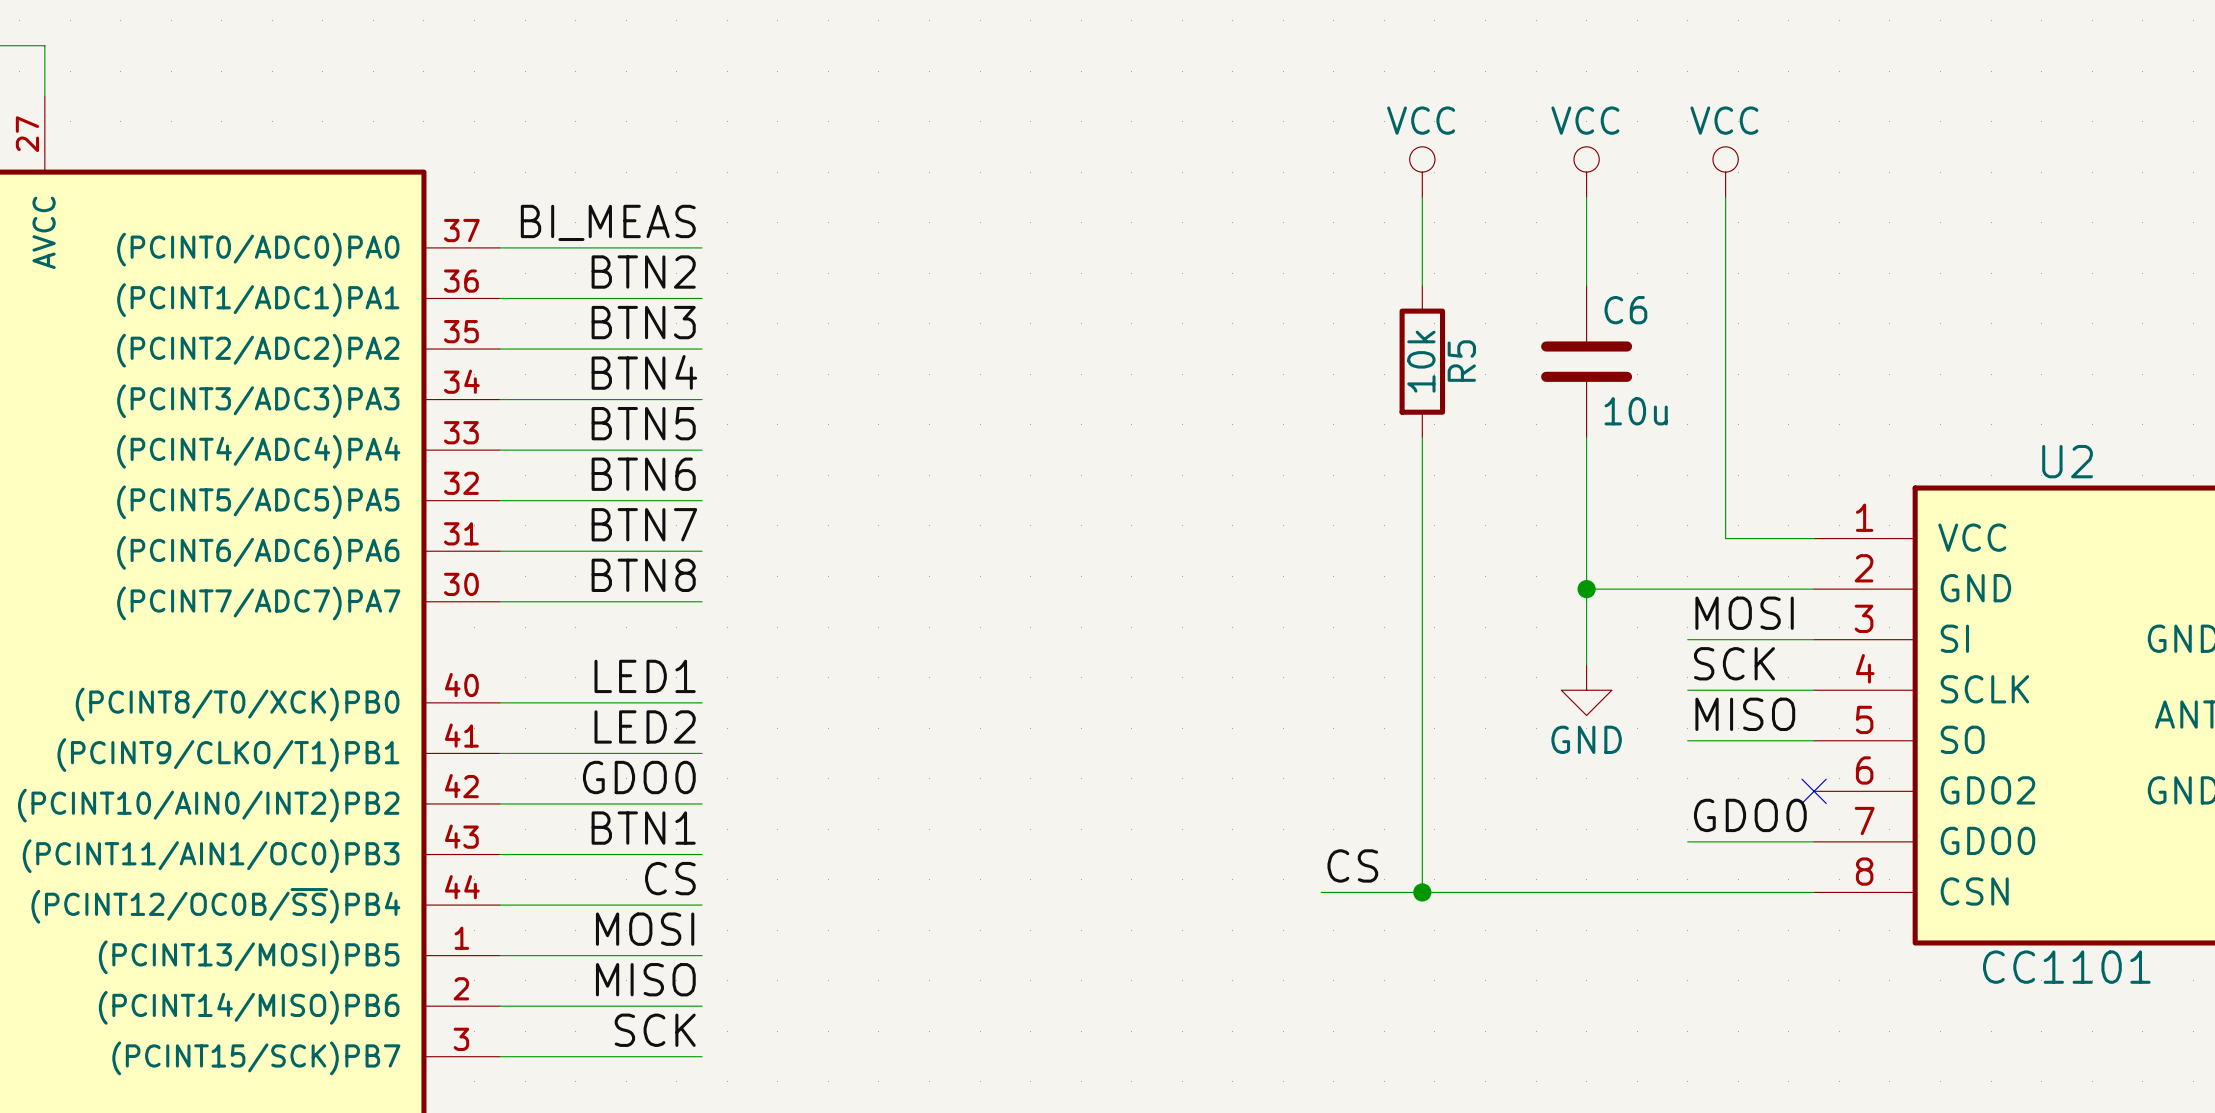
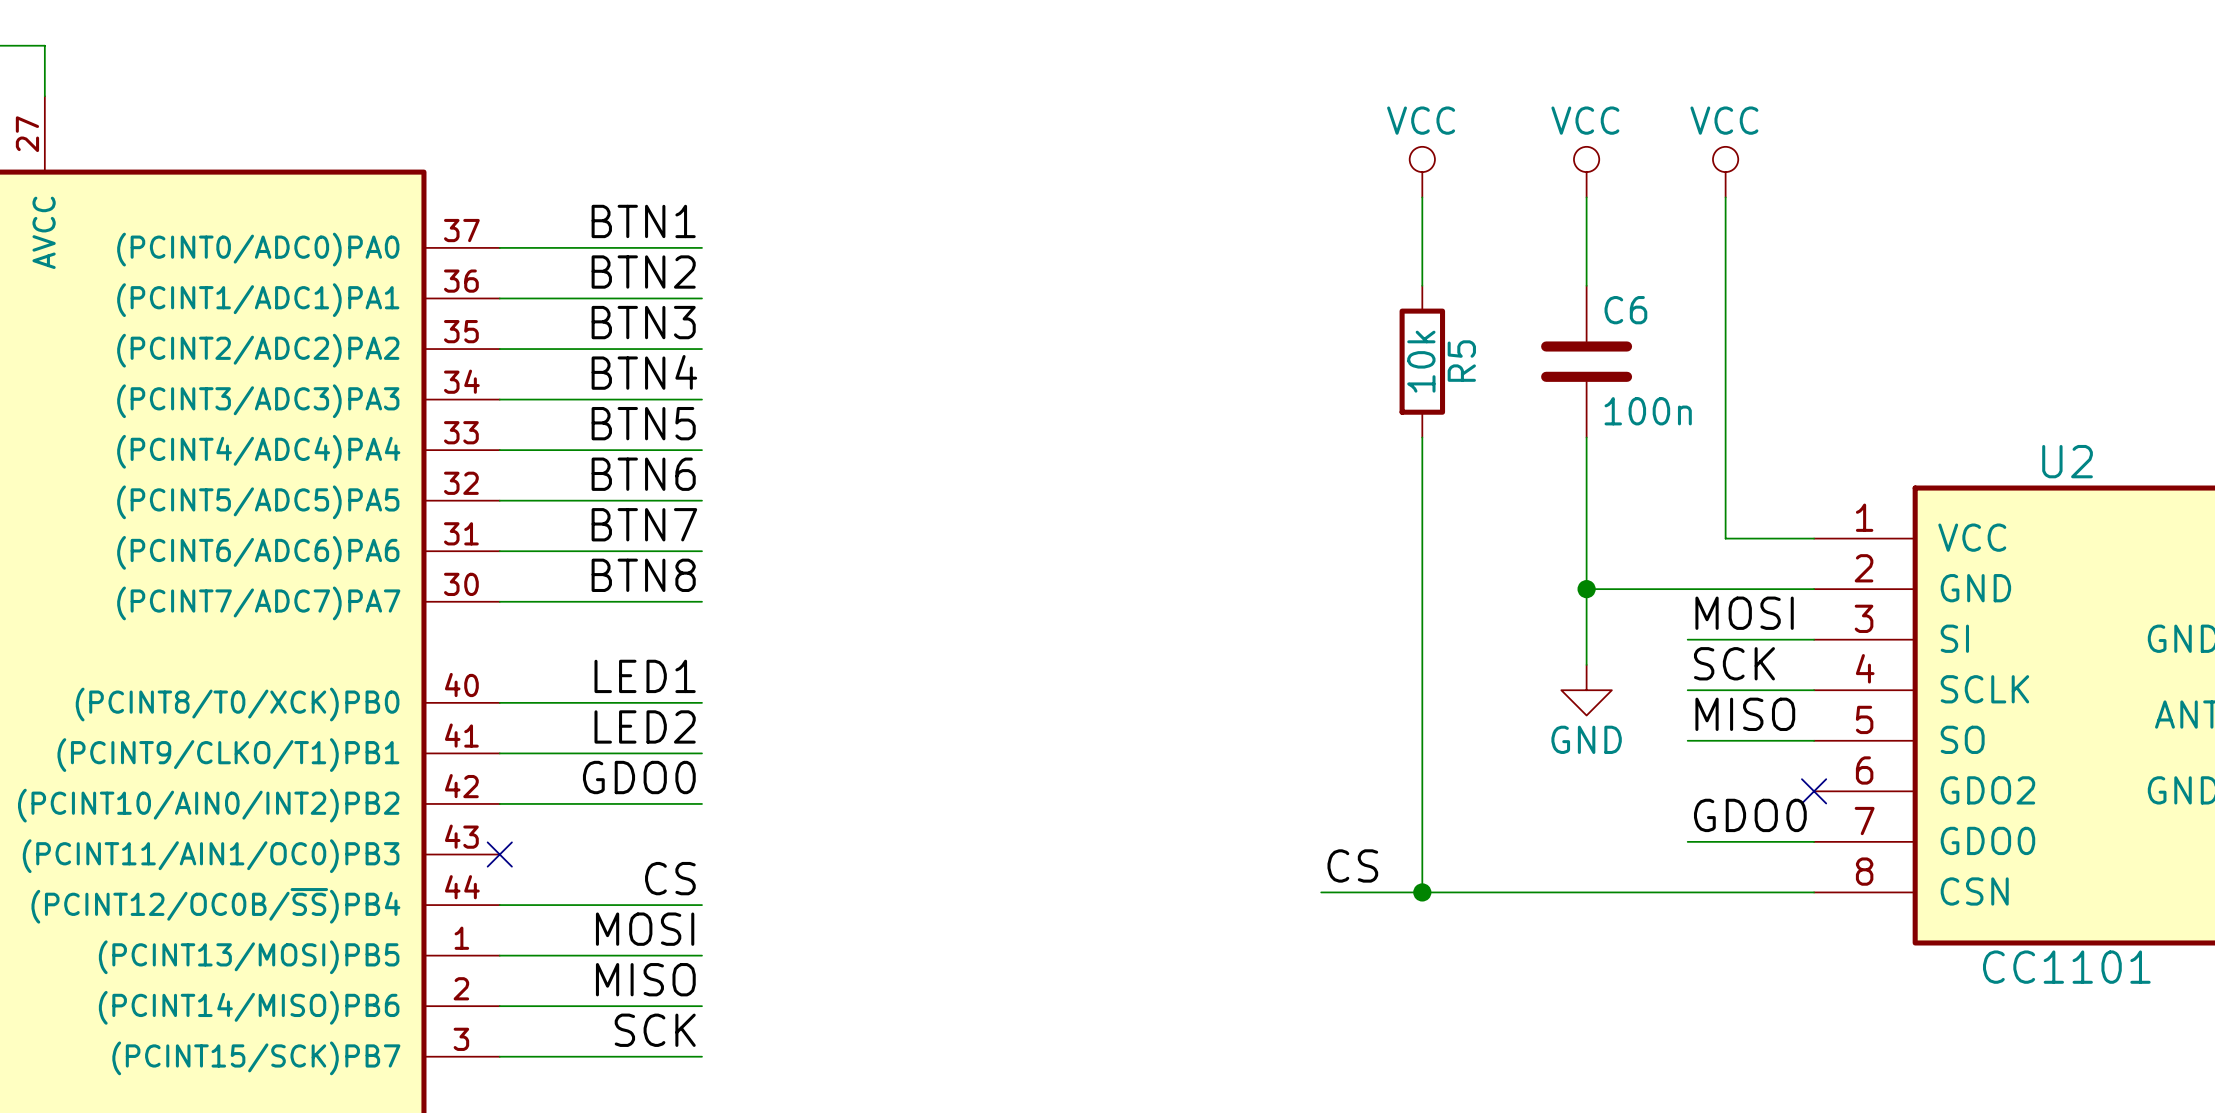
label: BI_MEAS (608, 222) -> BTN1 (643, 221)
C6 value: 10u (1636, 411) -> 100n (1648, 411)
label: BTN1 (643, 828) -> none
wire: (499, 854) (701, 854) -> none
no-connect mark: none -> (499, 854)

